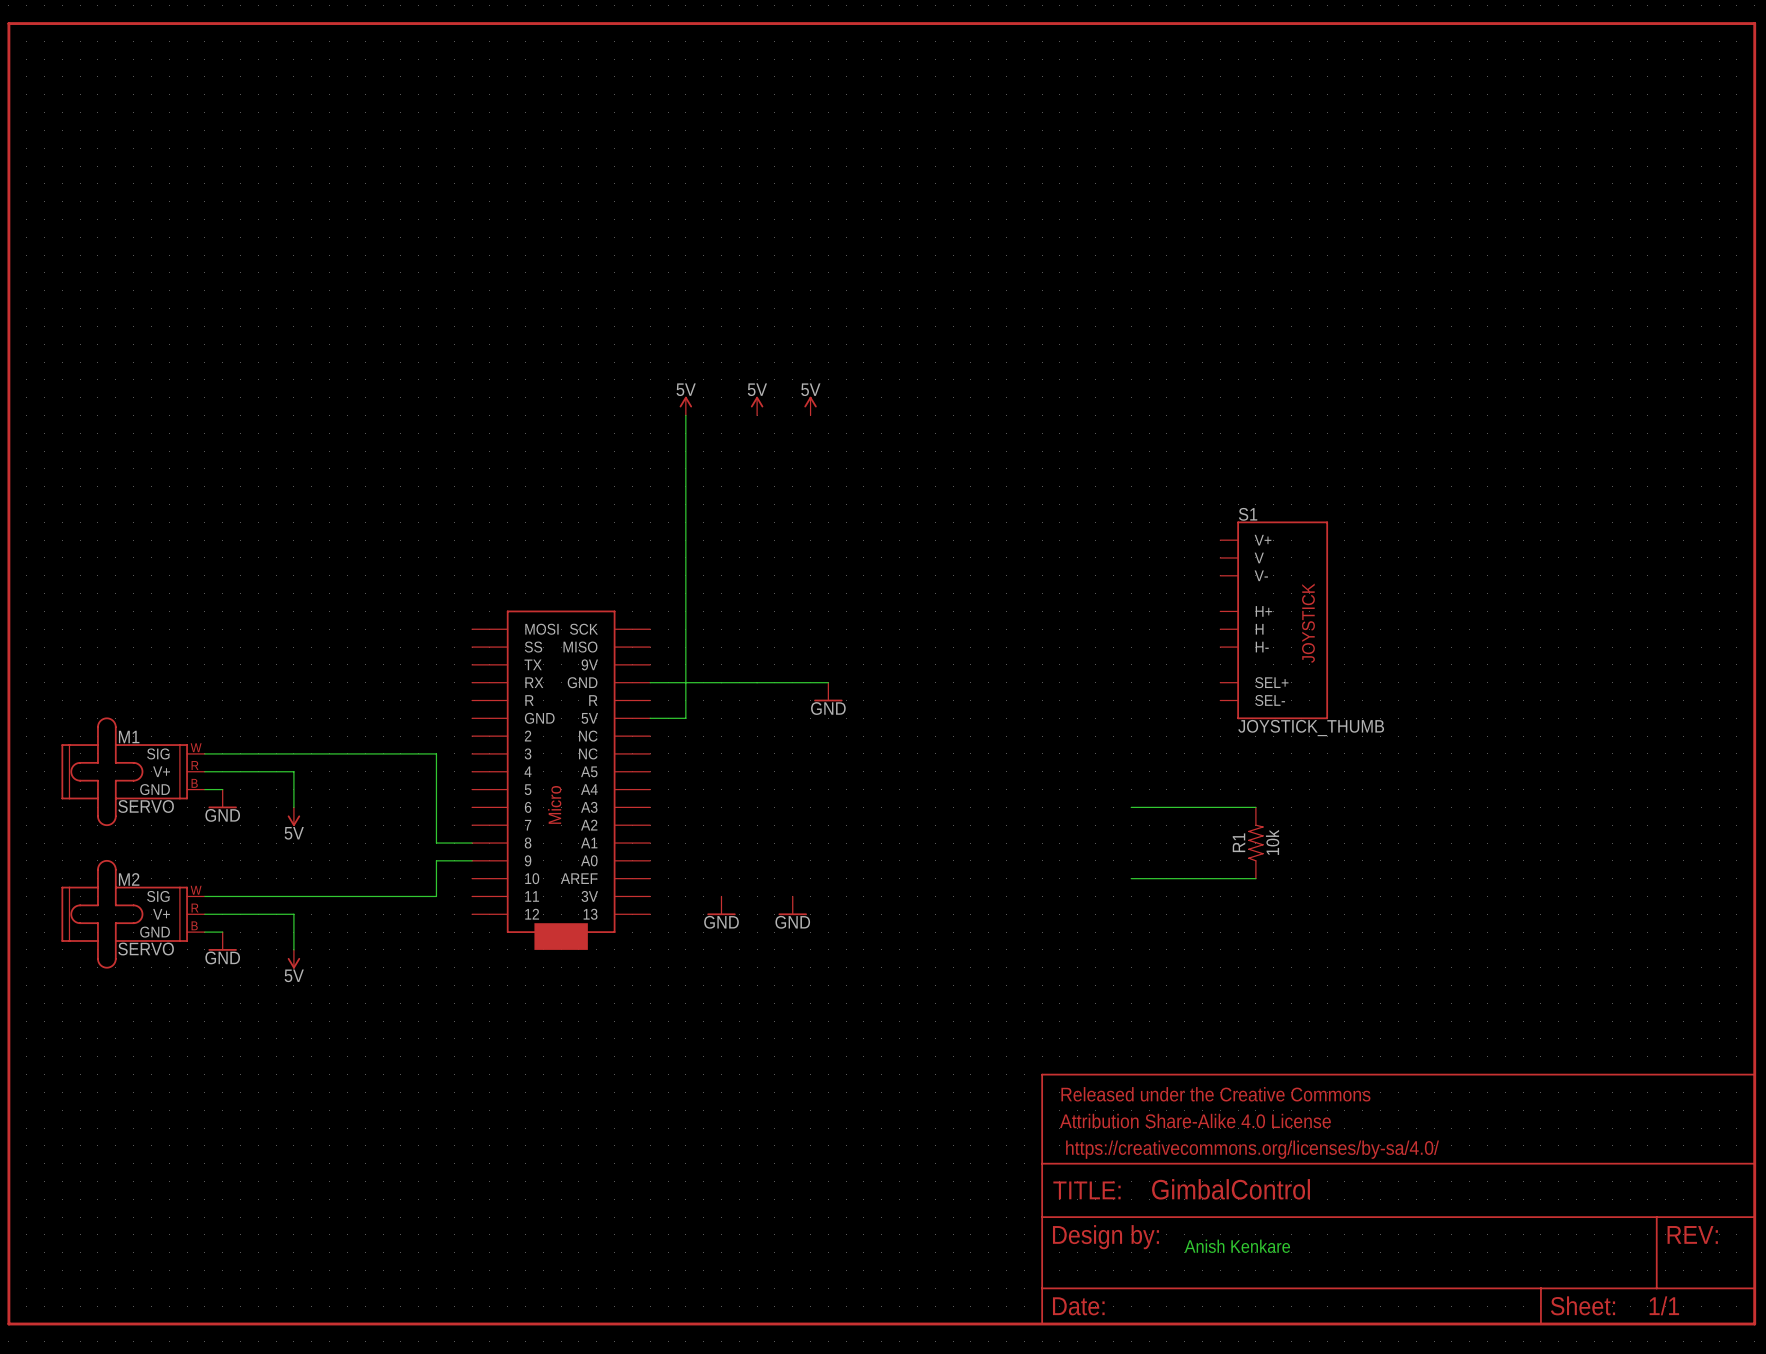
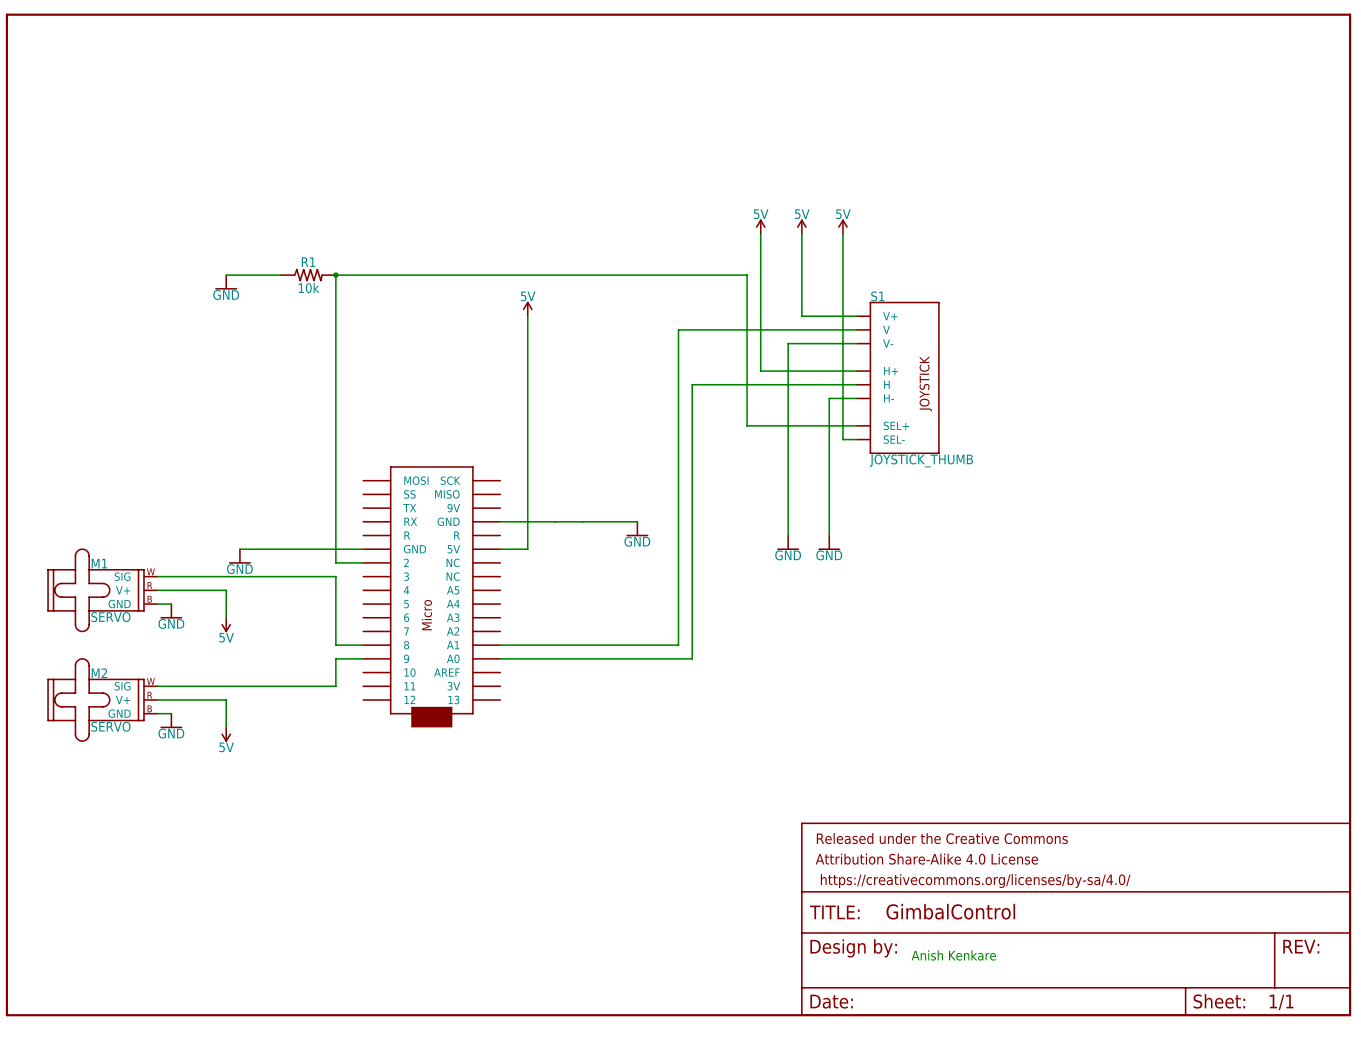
power symbol: none -> 5V (760, 226)
power symbol: none -> 5V (801, 226)
power symbol: none -> 5V (842, 226)
wire: none -> (760, 233) (760, 371) (856, 371)
wire: none -> (801, 233) (801, 316) (856, 316)
wire: none -> (842, 233) (842, 439) (856, 439)
wire: none -> (226, 275) (281, 275)
junction: none -> (335, 275)
power symbol: none -> GND (226, 282)
power symbol: 5V (757, 406) -> none
power symbol: 5V (810, 406) -> none
wire: none -> (856, 329) (678, 329) (678, 645) (500, 645)
wire: none -> (856, 343) (788, 343) (788, 535)
wire: none -> (856, 384) (692, 384) (692, 658) (500, 658)
wire: none -> (856, 398) (829, 398) (829, 535)
wire: none -> (856, 425) (747, 425) (747, 275) (335, 275) (335, 562) (363, 562)
S1 position: (1274, 620) -> (898, 377)
power symbol: none -> GND (788, 542)
power symbol: none -> GND (829, 542)
wire: none -> (239, 549) (363, 549)
power symbol: none -> GND (239, 556)
wire: (1131, 807) (1255, 807) -> none
R1 rotation: 0° (1255, 843) -> 90° clockwise (308, 275)
R1 position: (1255, 843) -> (308, 275)
wire: (1131, 878) (1255, 878) -> none
power symbol: GND (721, 905) -> none
power symbol: GND (792, 905) -> none

